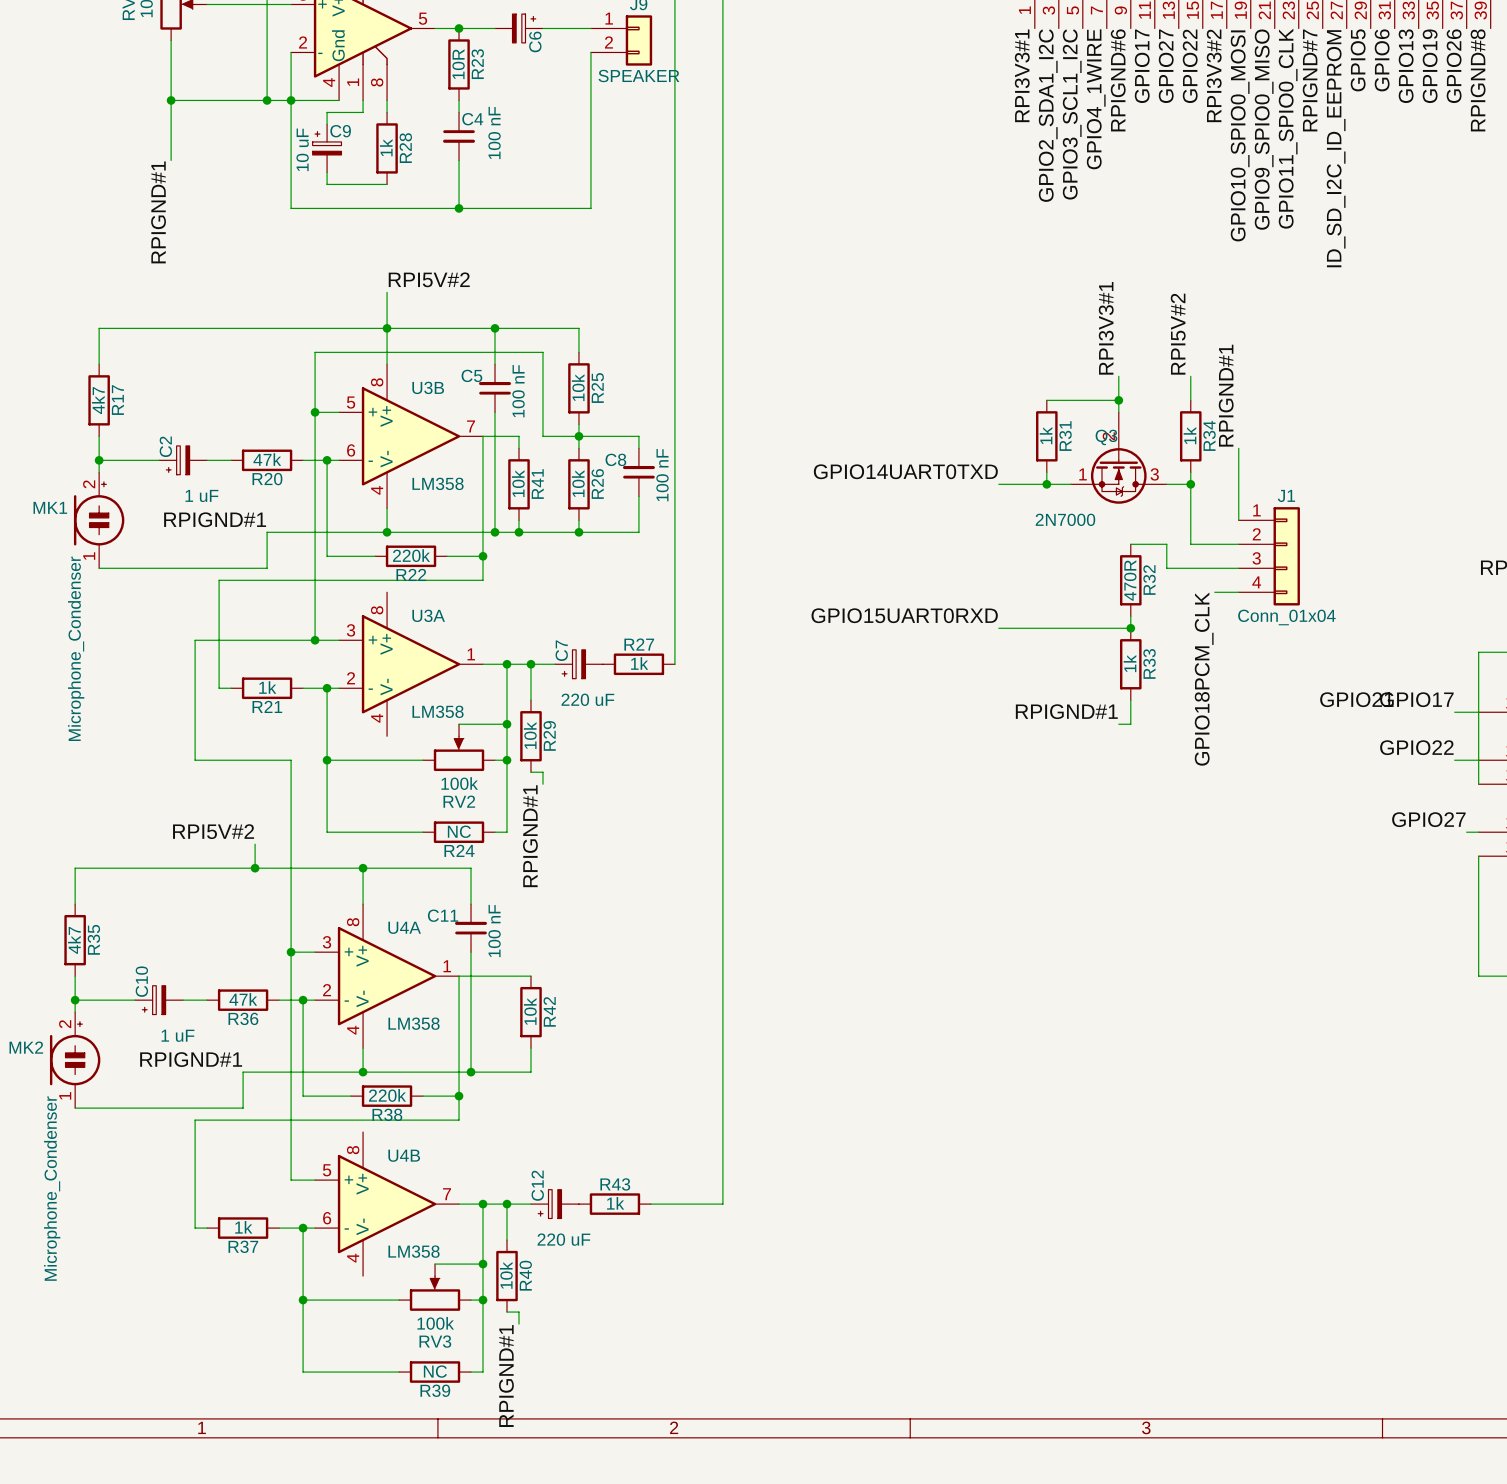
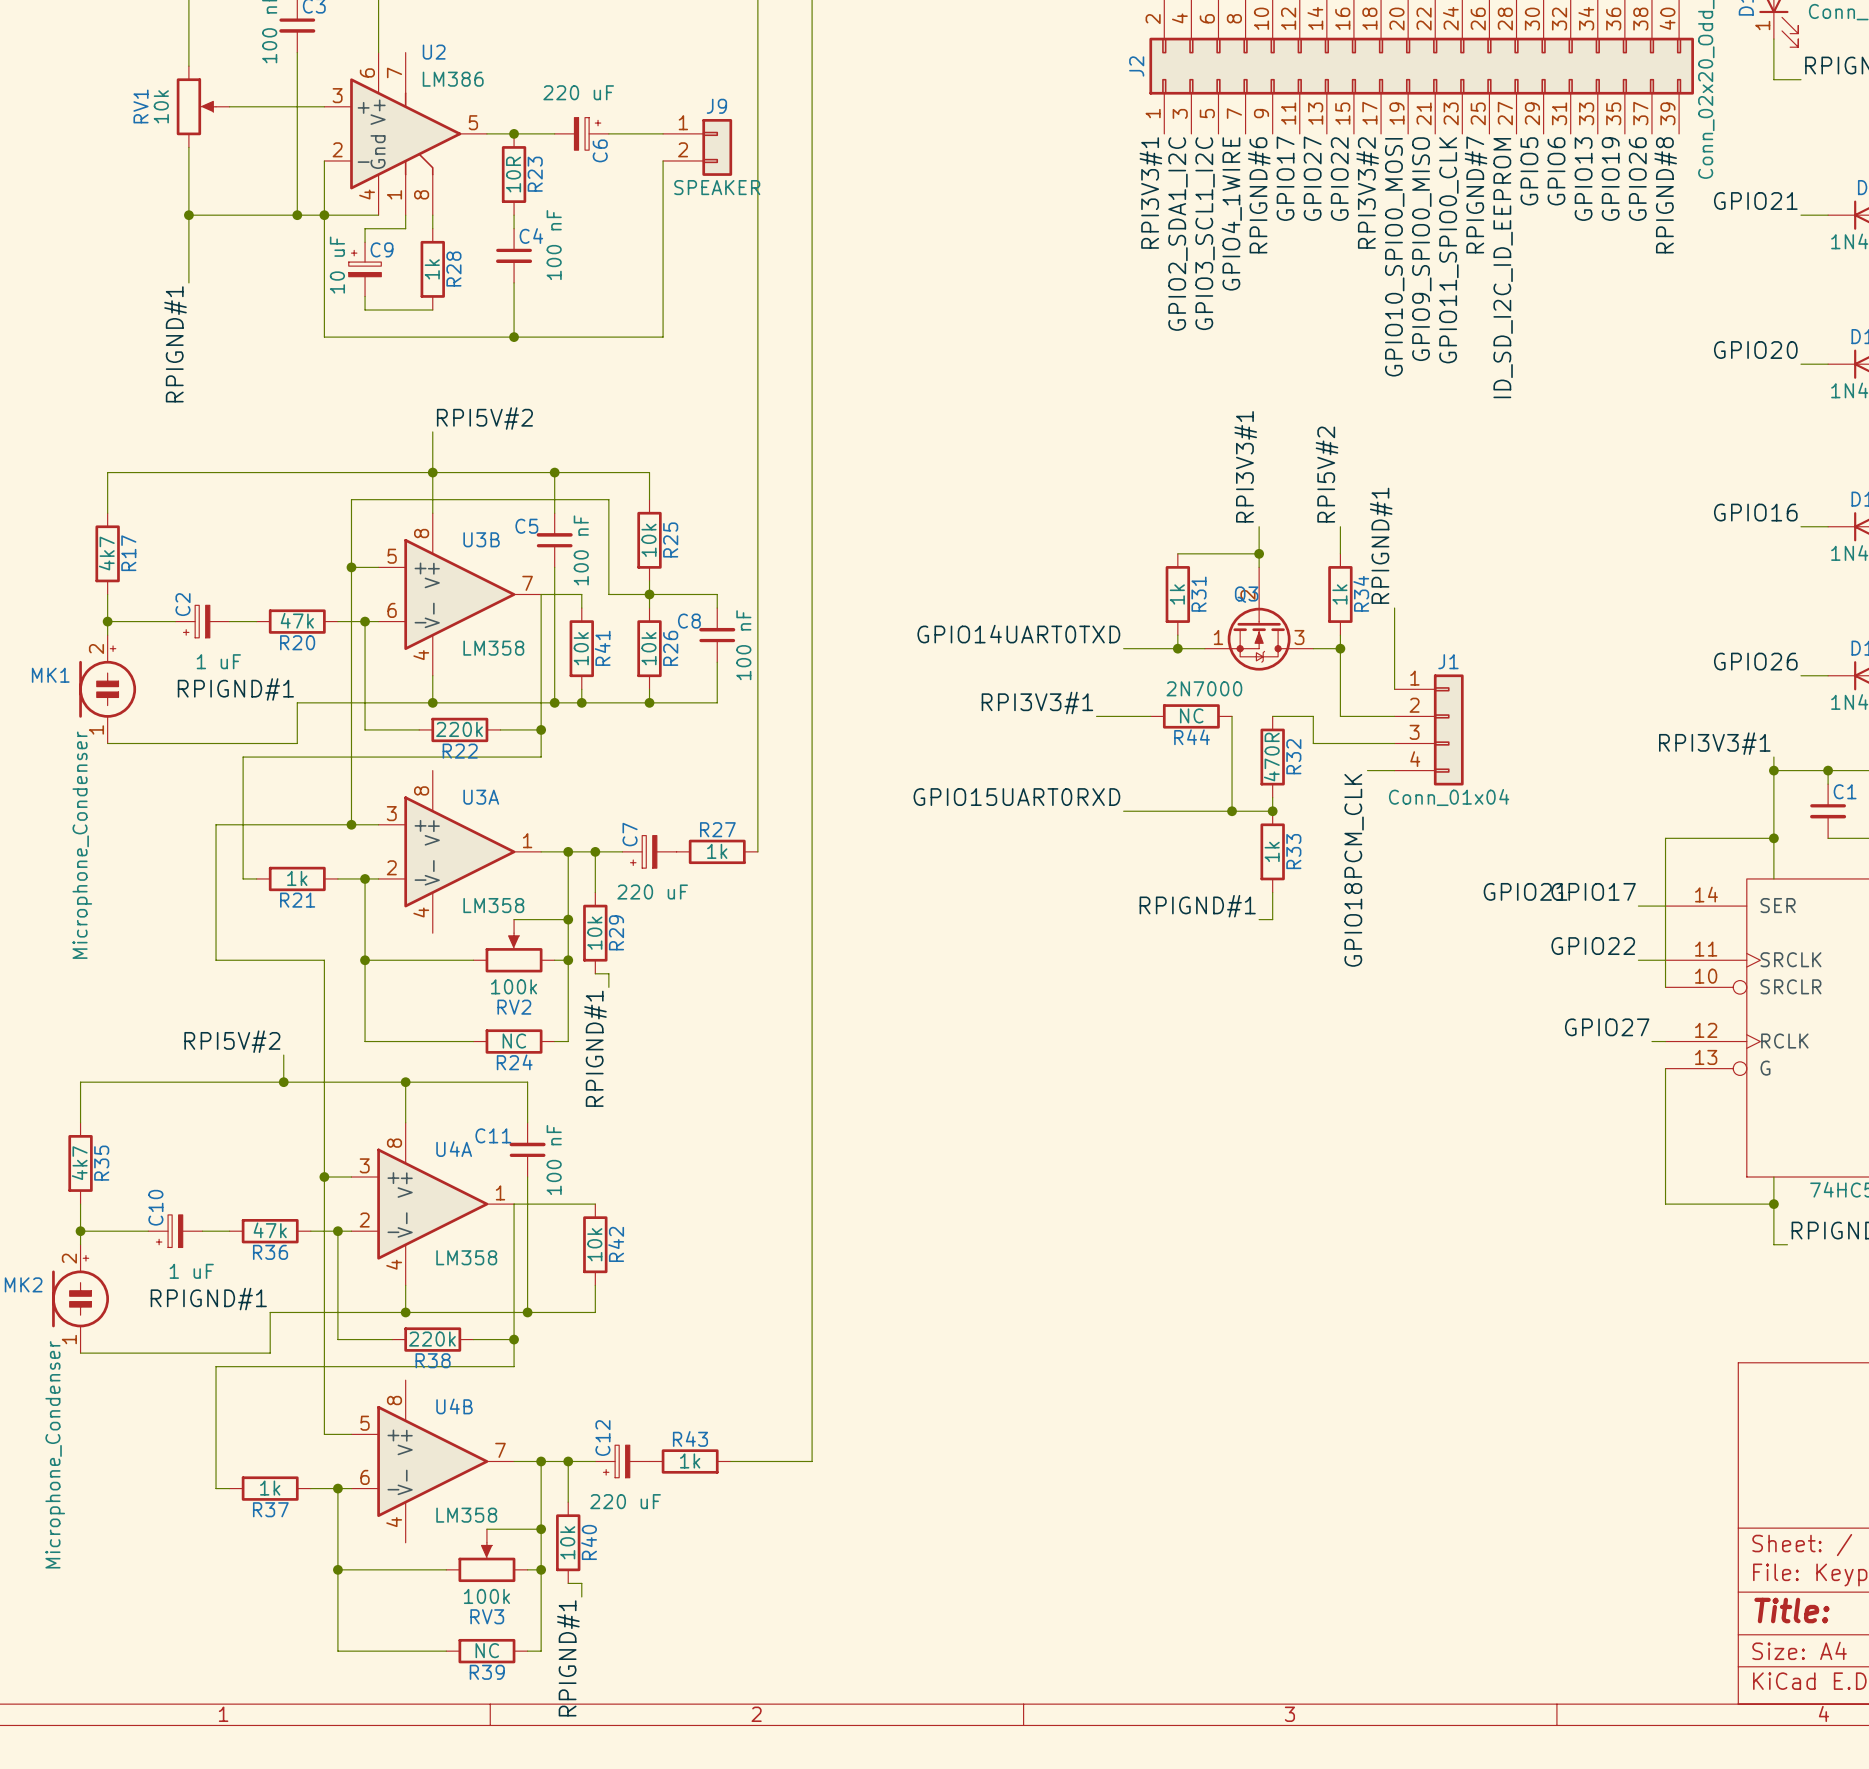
label: none -> RPI3V3#1 (1037, 703)
wire: none -> (1096, 716) (1150, 716)
R44: none -> NC (1191, 716)
wire: none -> (1232, 716) (1232, 811)
junction: none -> (1232, 811)

